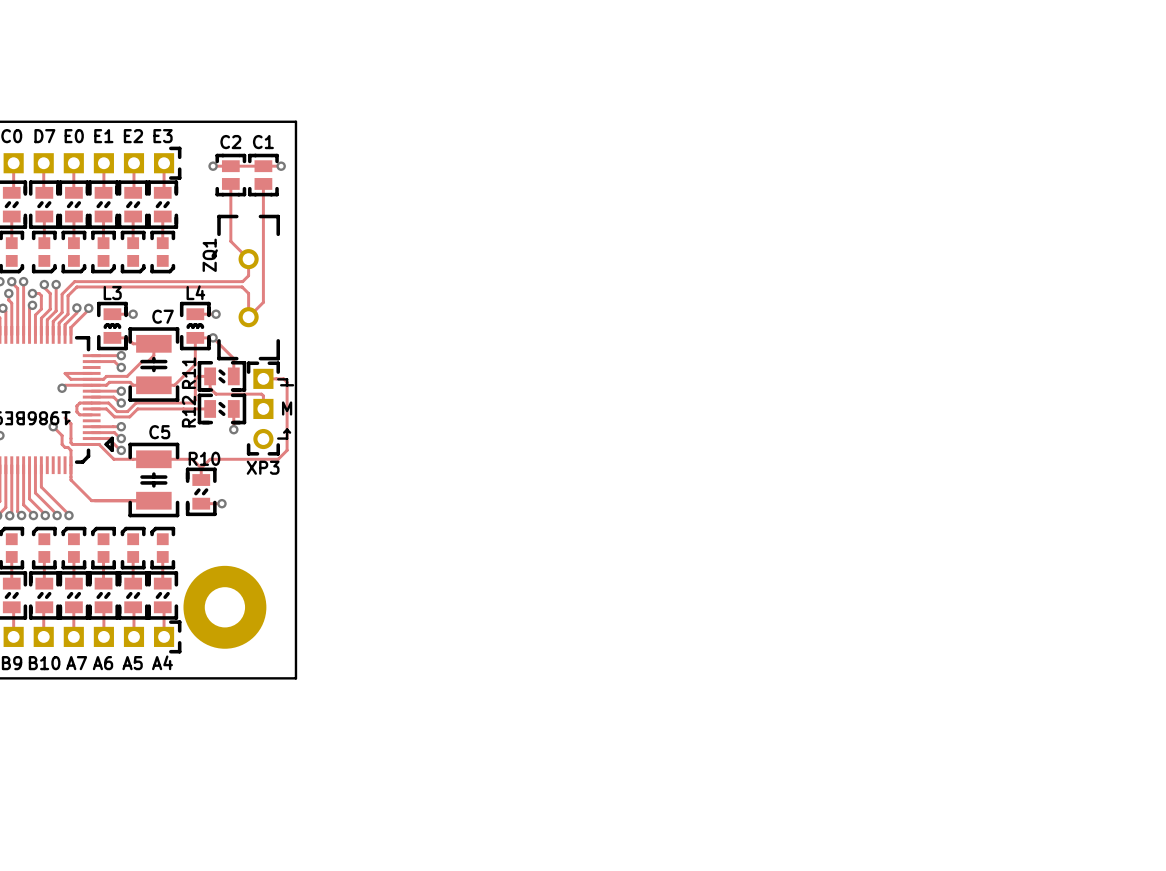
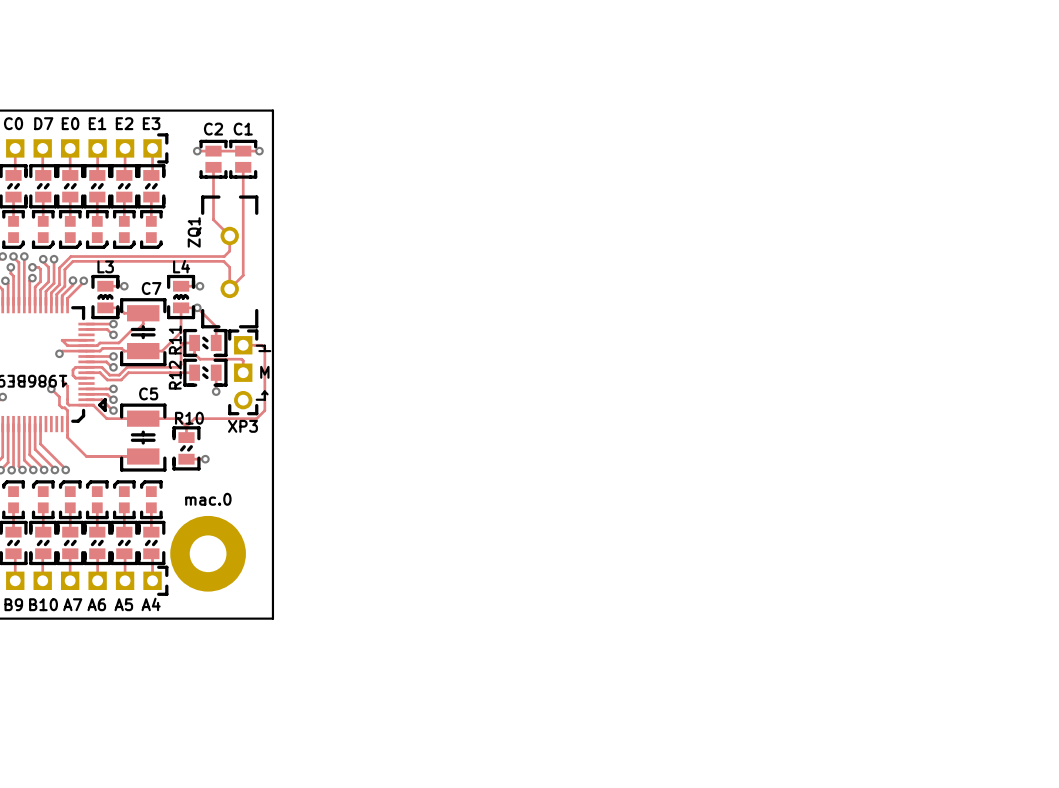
text: none -> mac.0 (208, 499)

